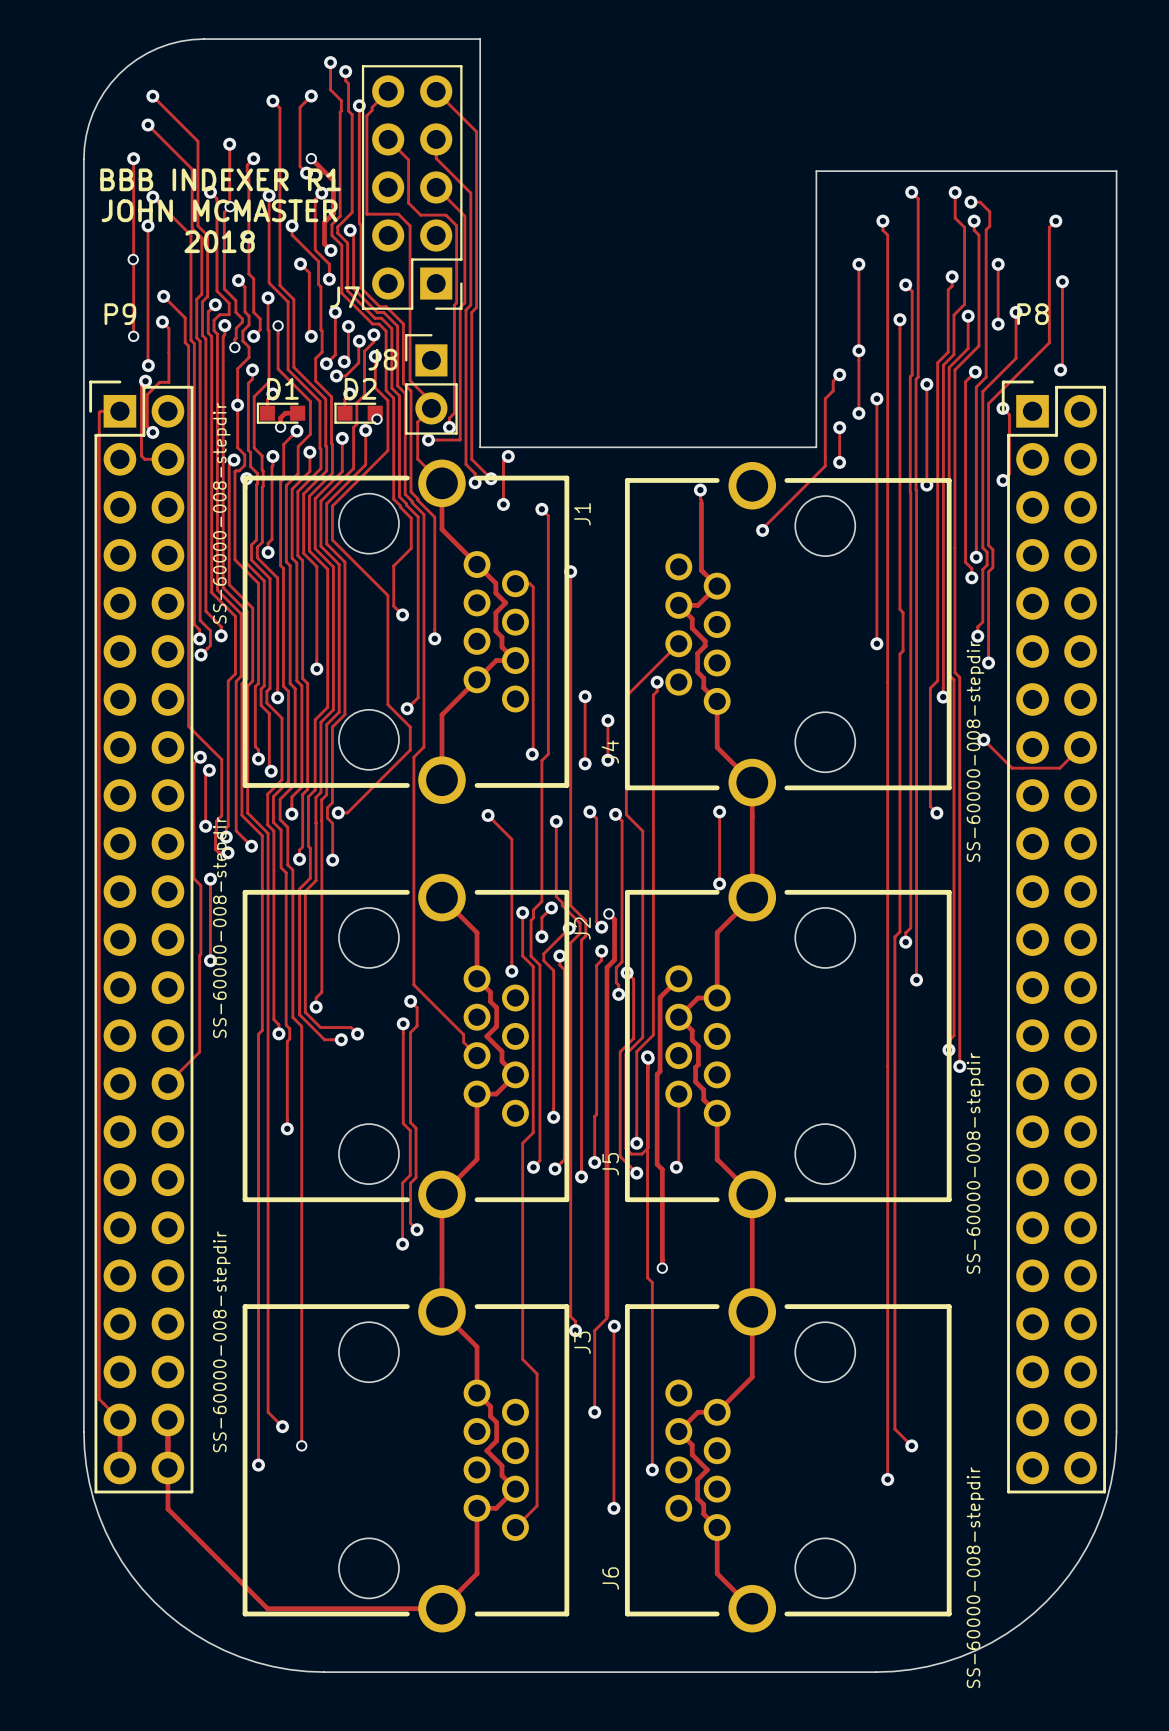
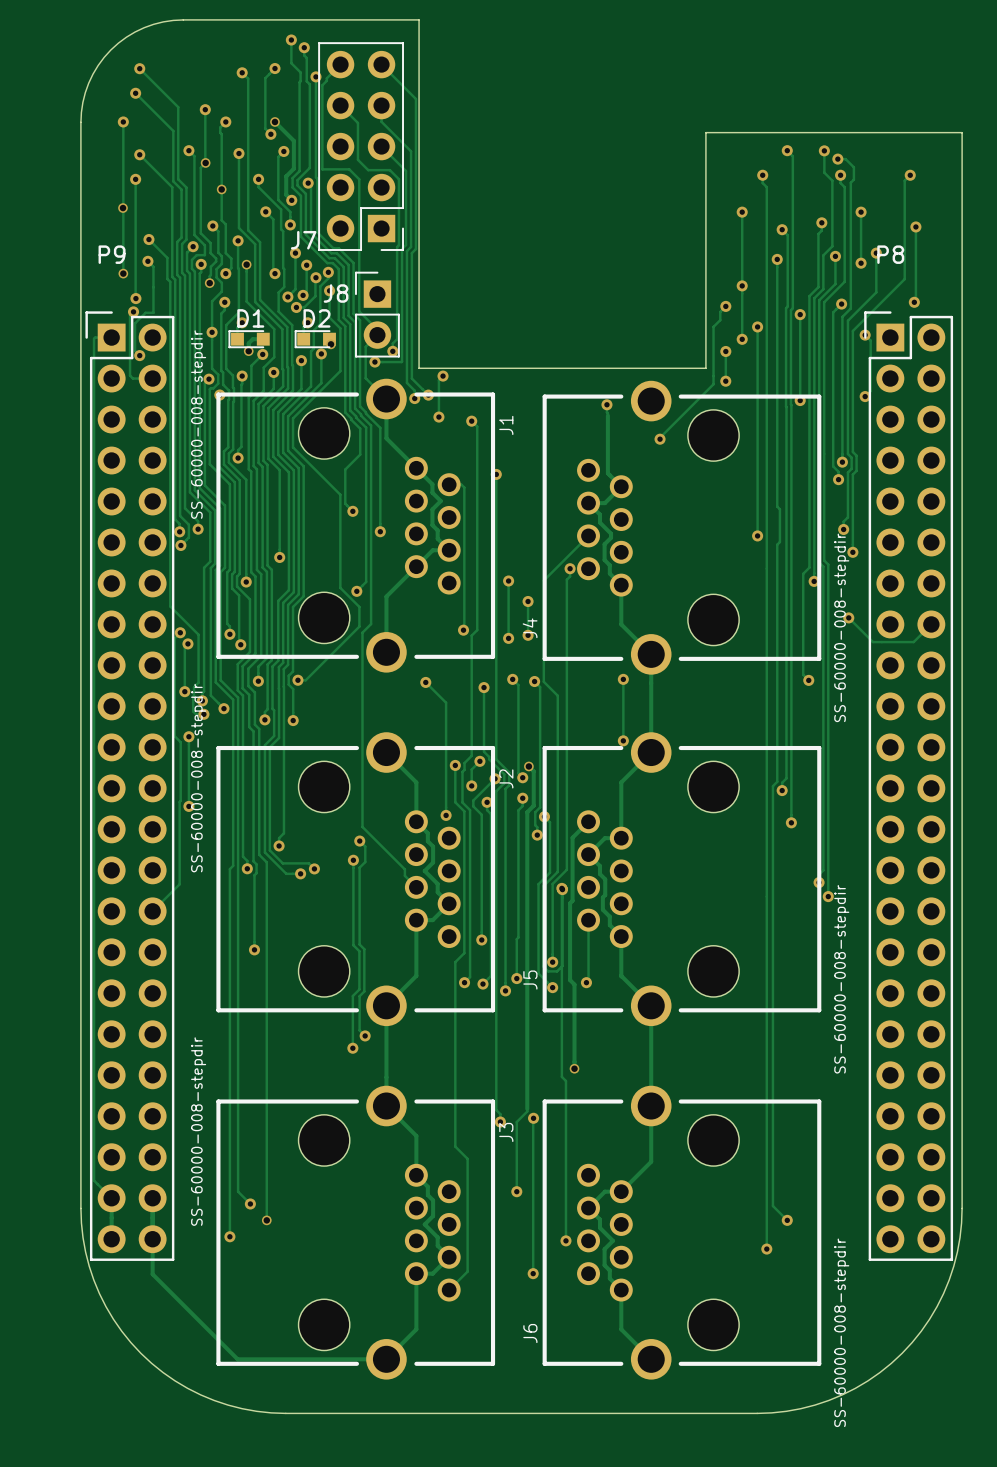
text: BBB INDEXER R1 (220, 179) -> none
text: JOHN MCMASTER (219, 210) -> none
text: 2018 (219, 241) -> none

